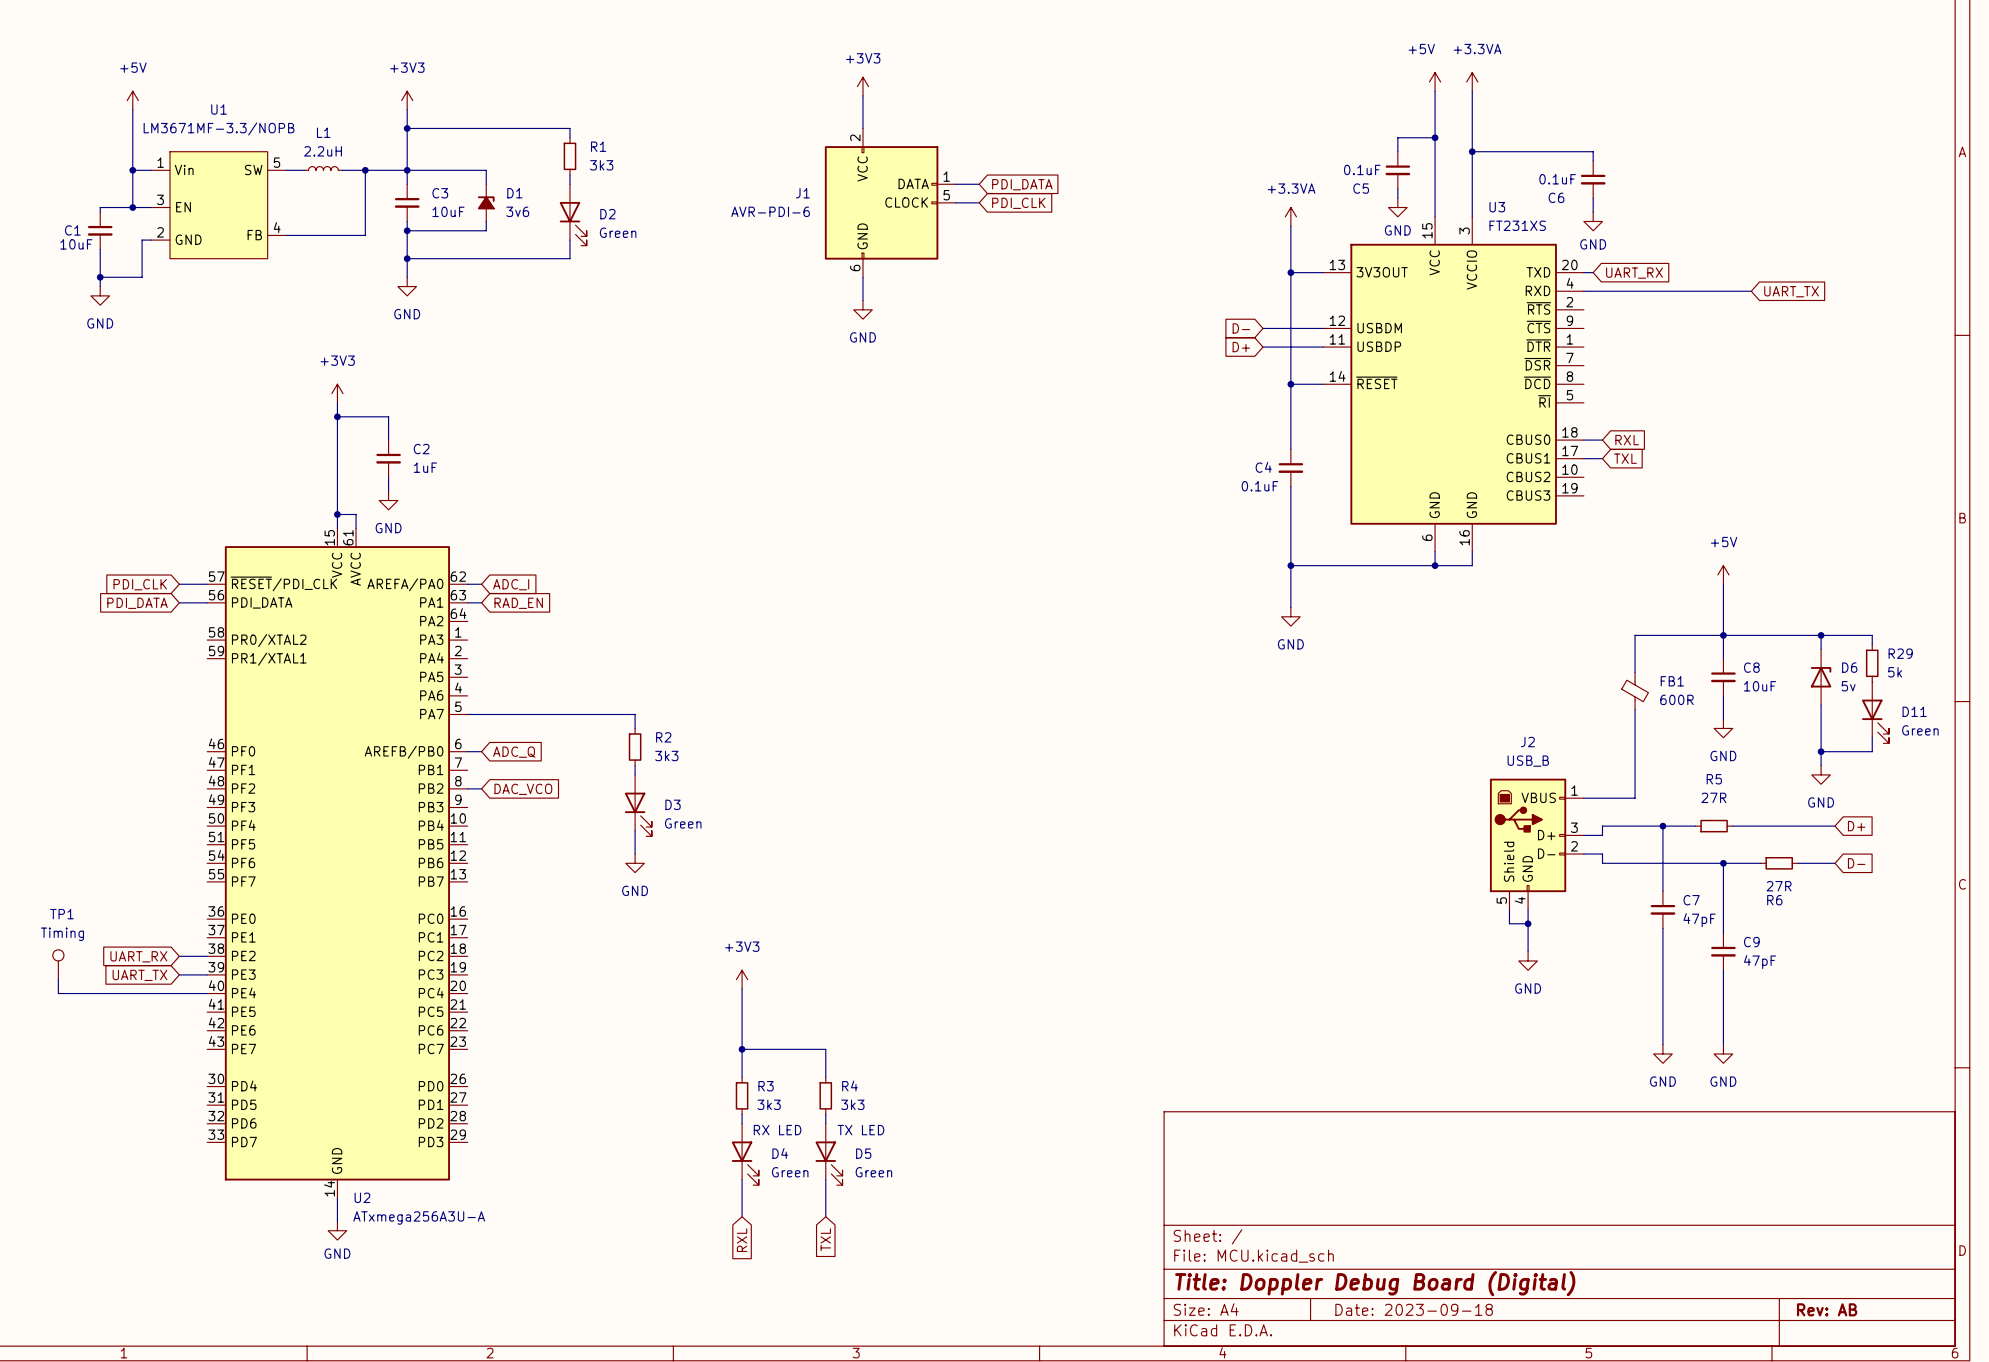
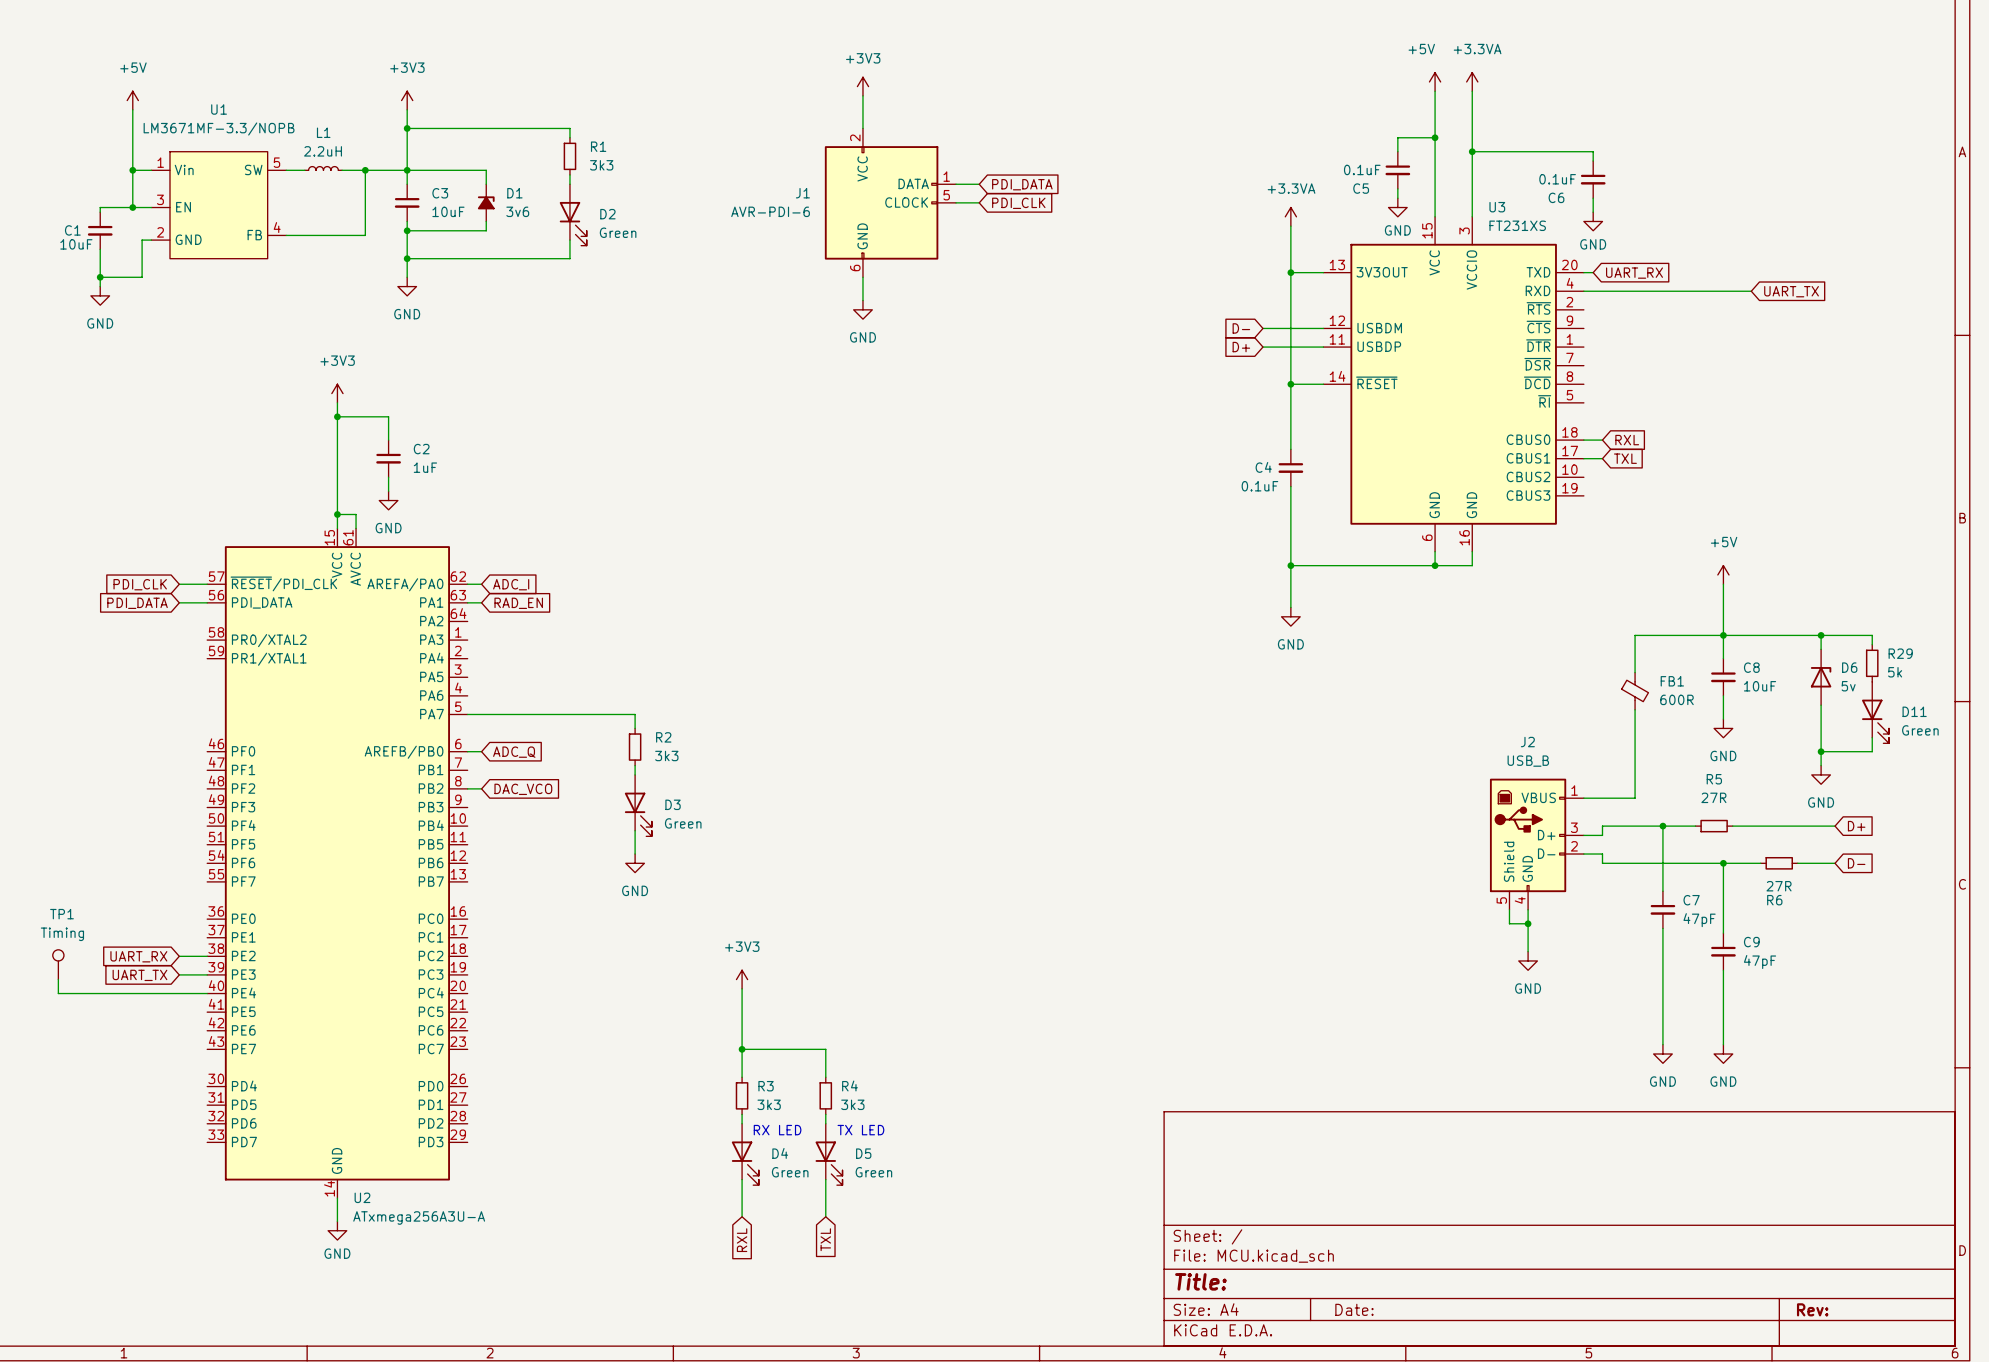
title block: Title: Doppler Debug Board (Digital) (1375, 1283) -> Title: (1200, 1281)
title block: Date: 2023-09-18 (1414, 1309) -> Date: (1354, 1309)
title block: Rev: AB (1827, 1309) -> Rev: (1812, 1309)

